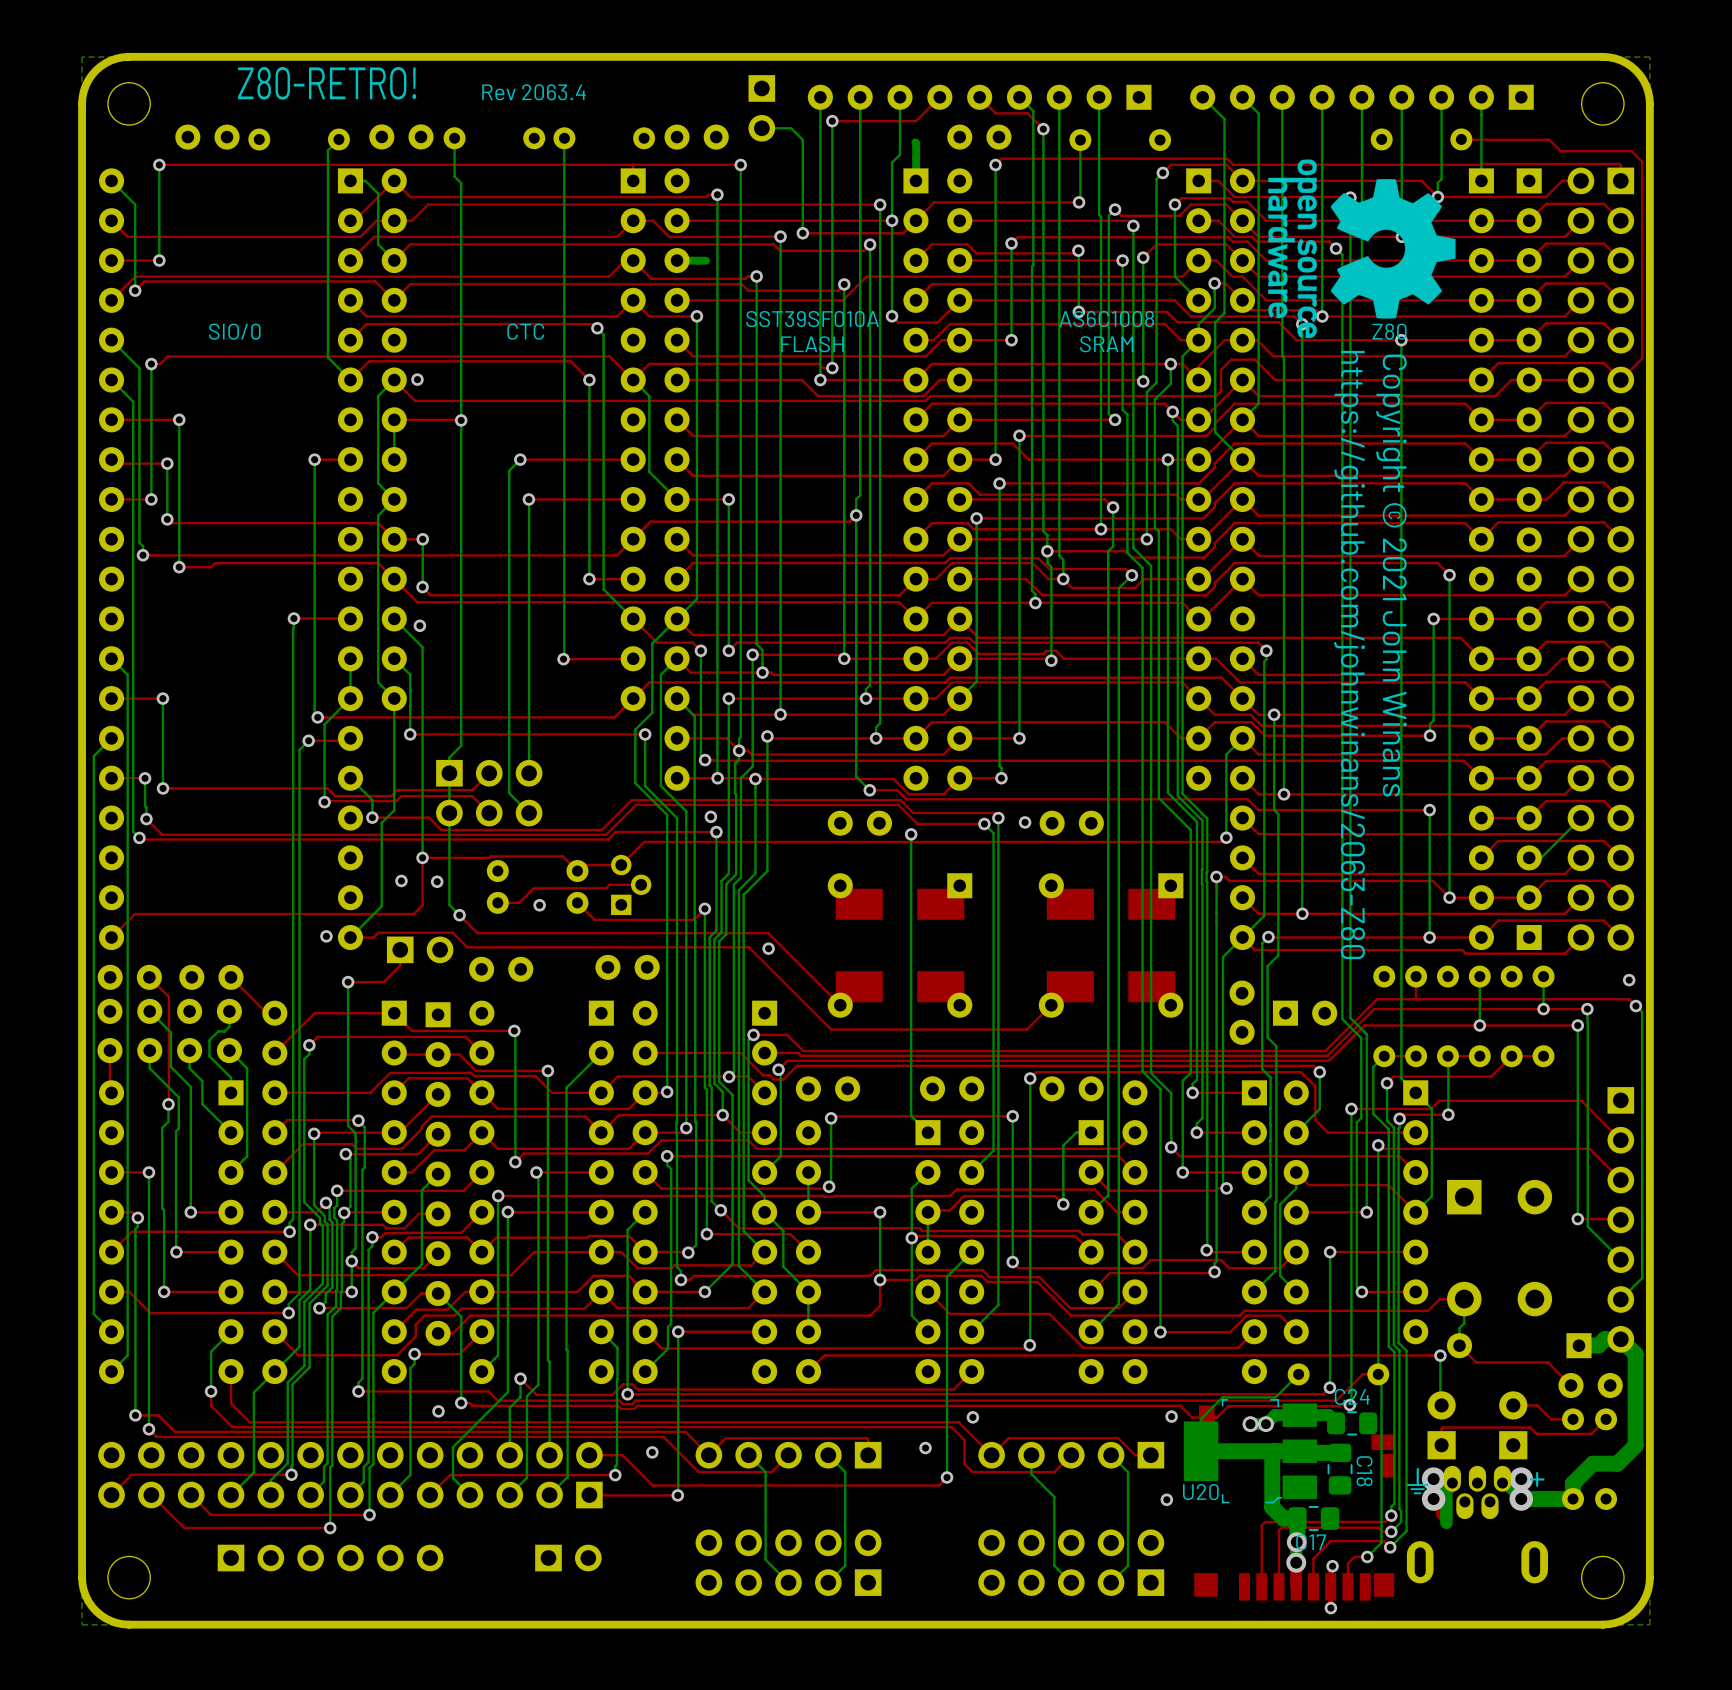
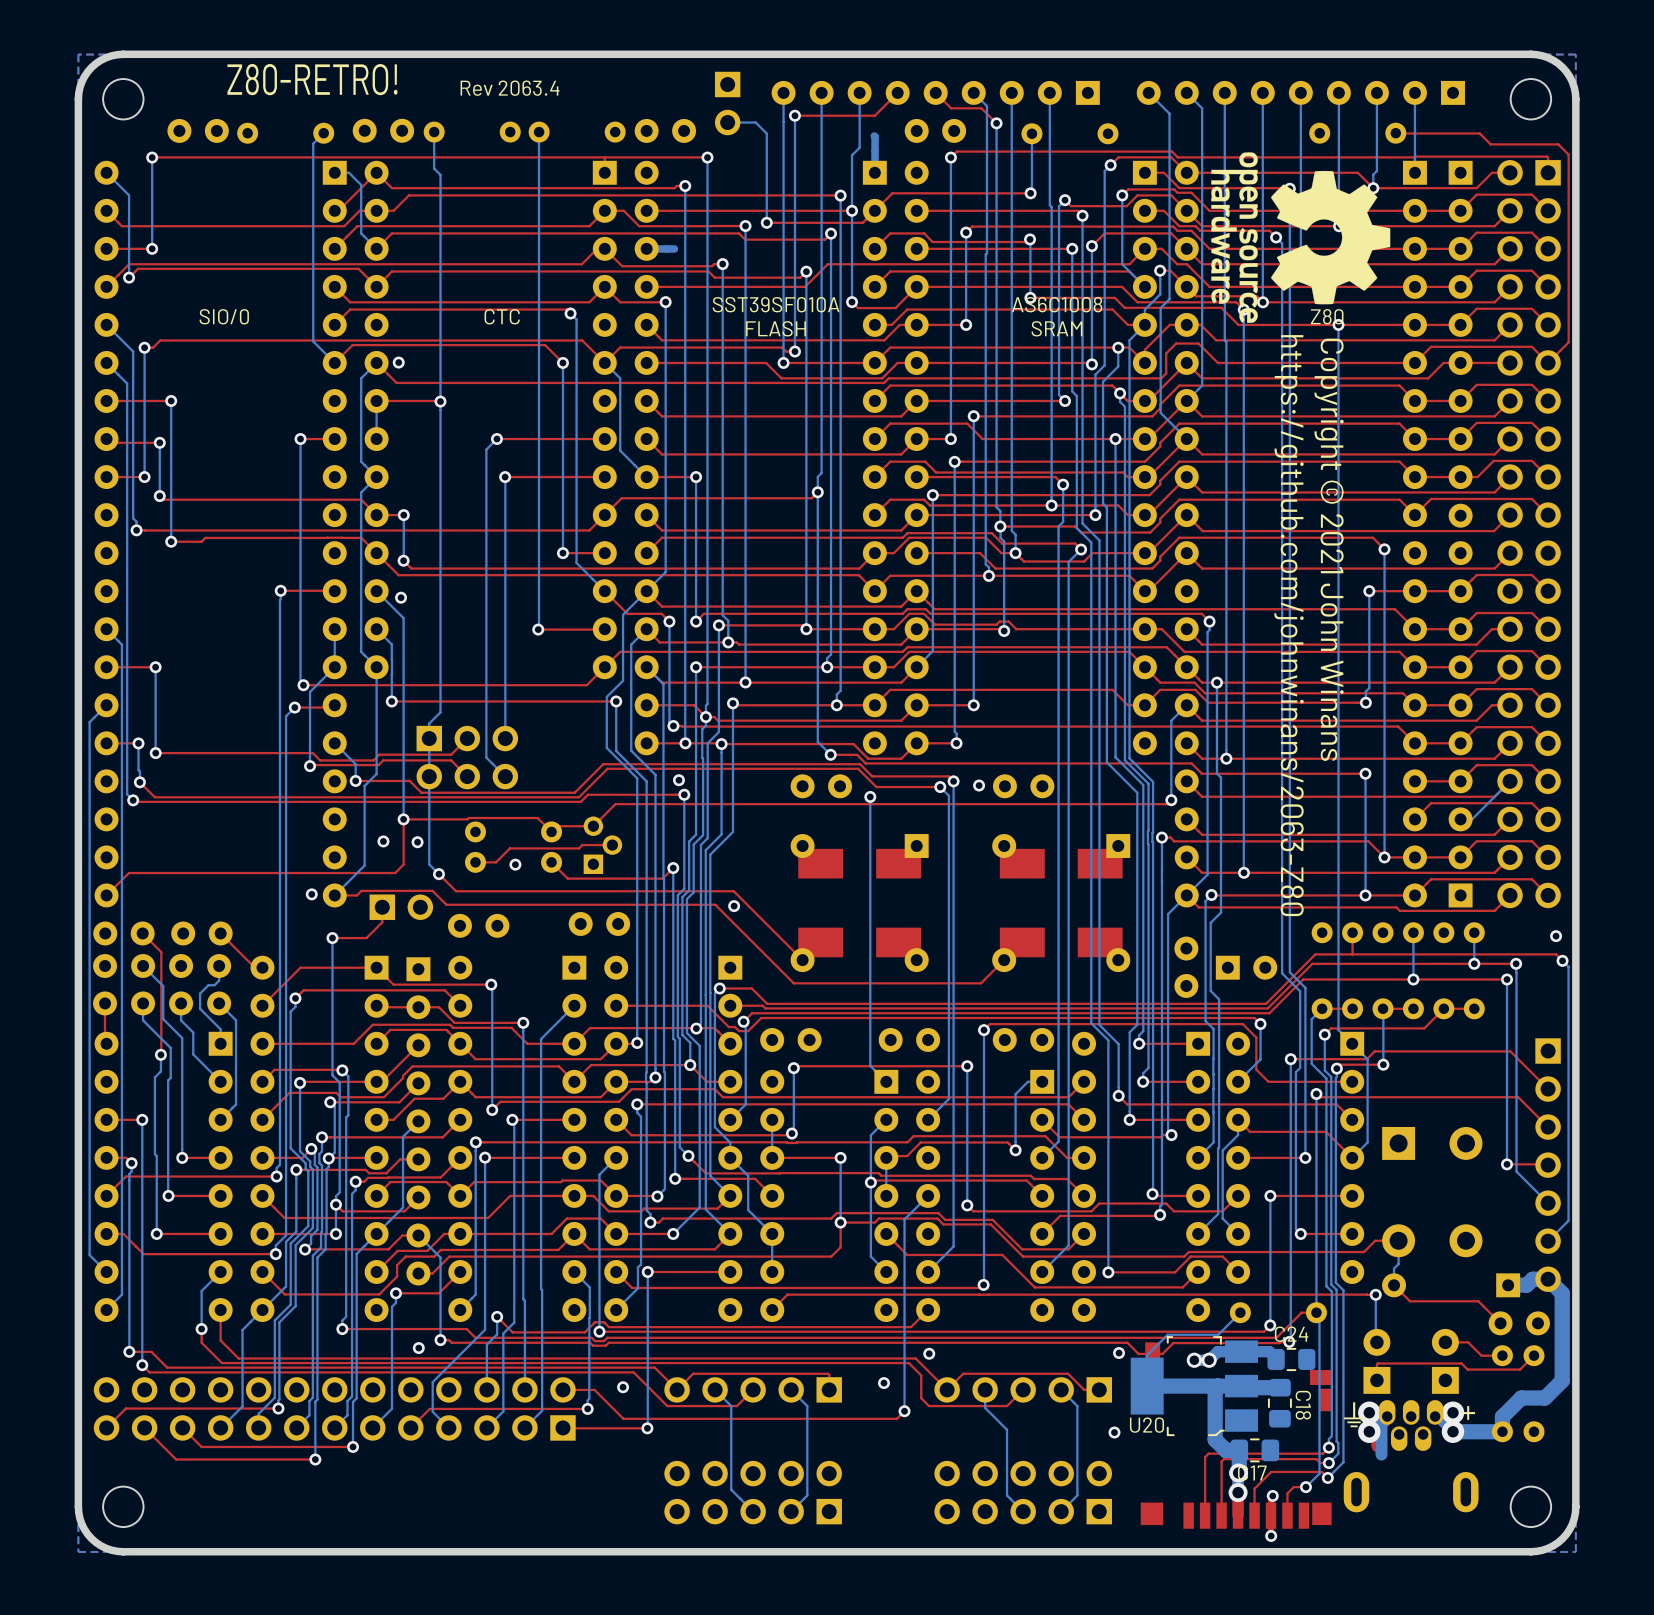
part: (330, 1558) -> none
part: (568, 1558) -> none

